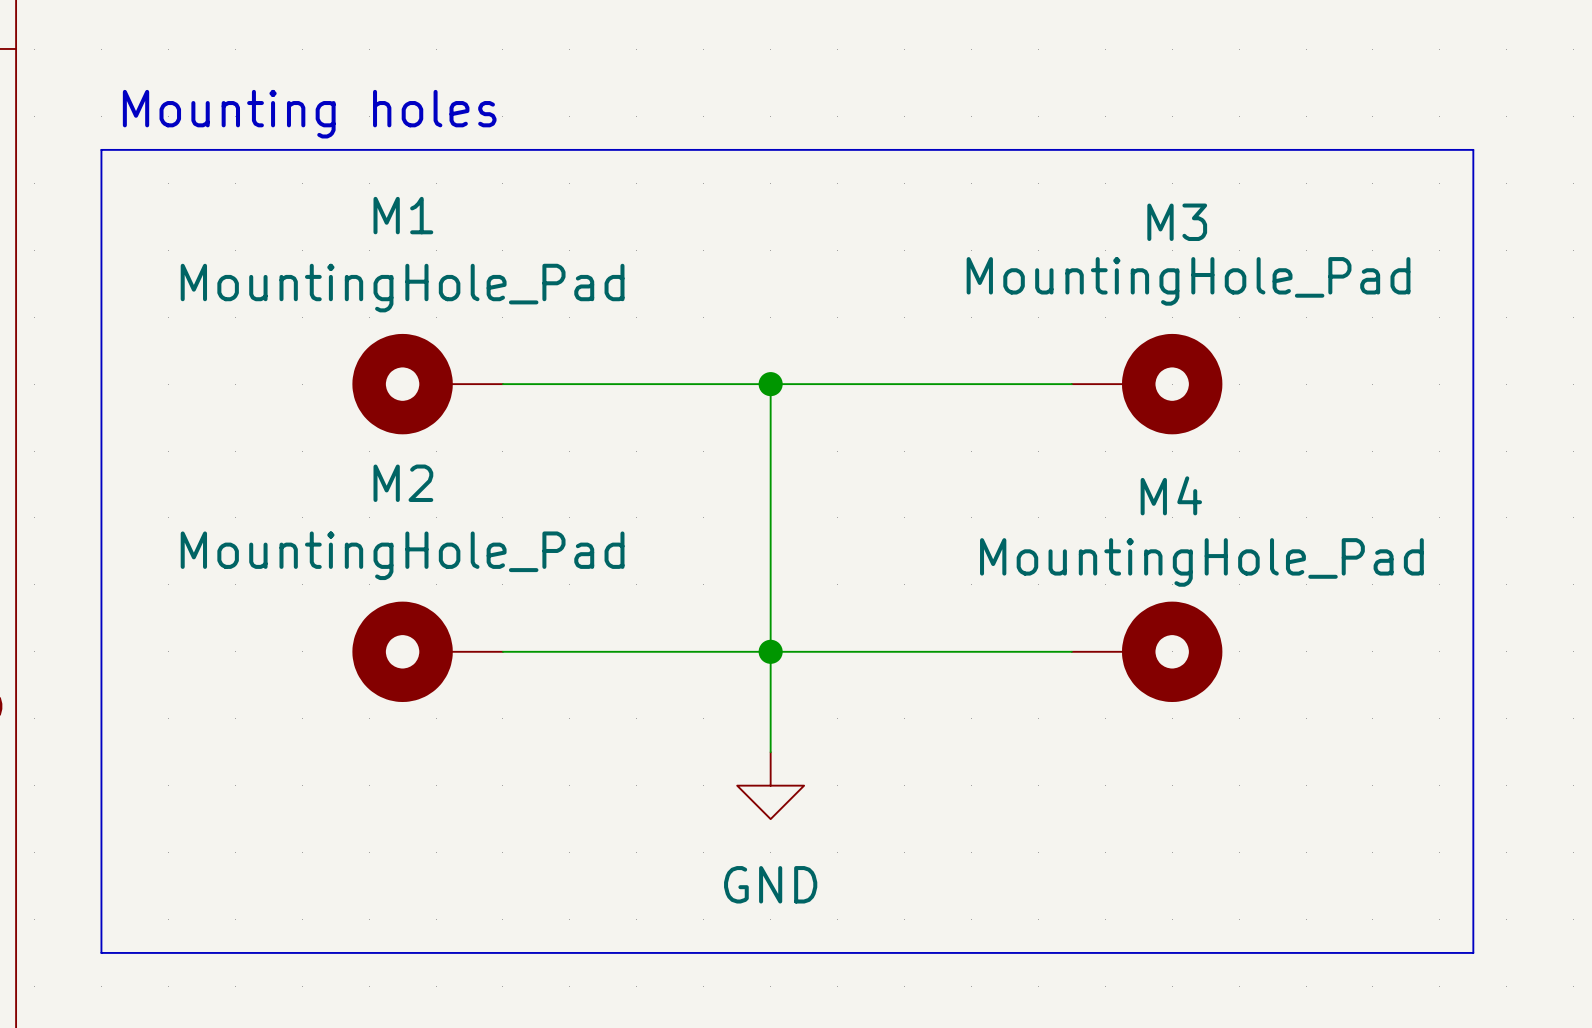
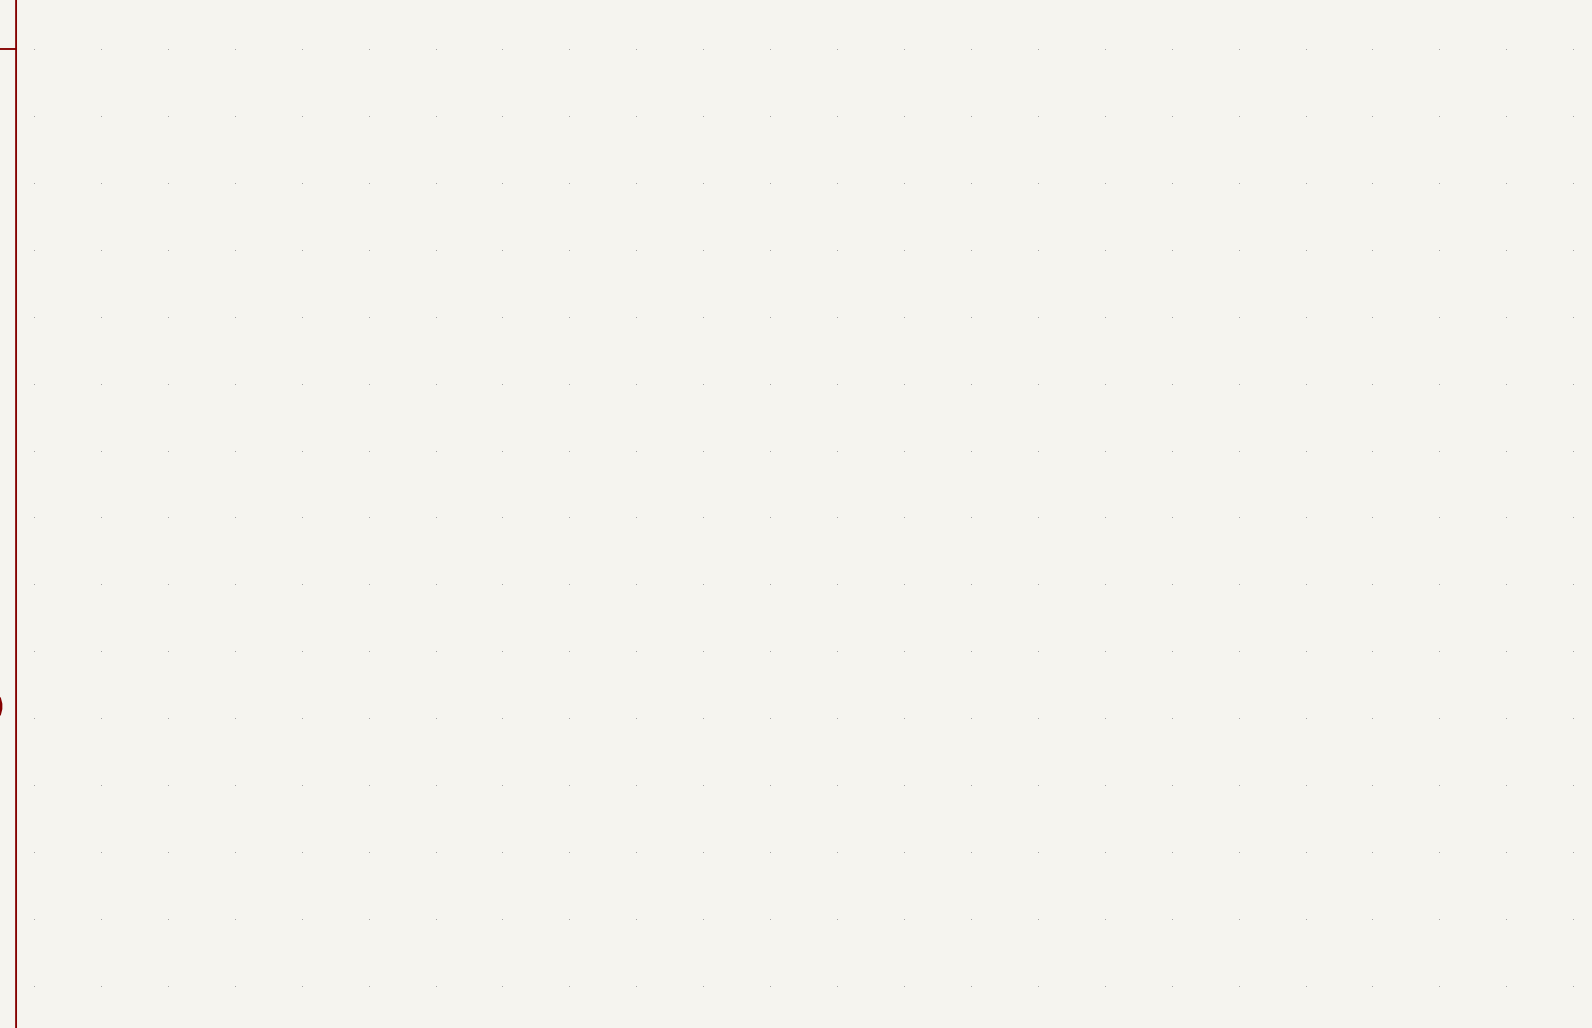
text: Mounting holes (309, 114) -> none
line: (101, 149) (1473, 149) (1473, 952) (101, 952) (101, 149) -> none
M1: MountingHole_Pad (427, 384) -> none
wire: (502, 384) (1071, 384) -> none
wire: (770, 384) (770, 752) -> none
junction: (770, 384) -> none
M3: MountingHole_Pad (1147, 384) -> none
M2: MountingHole_Pad (427, 651) -> none
wire: (502, 651) (1071, 651) -> none
junction: (770, 651) -> none
M4: MountingHole_Pad (1147, 651) -> none
power symbol: GND (770, 785) -> none

